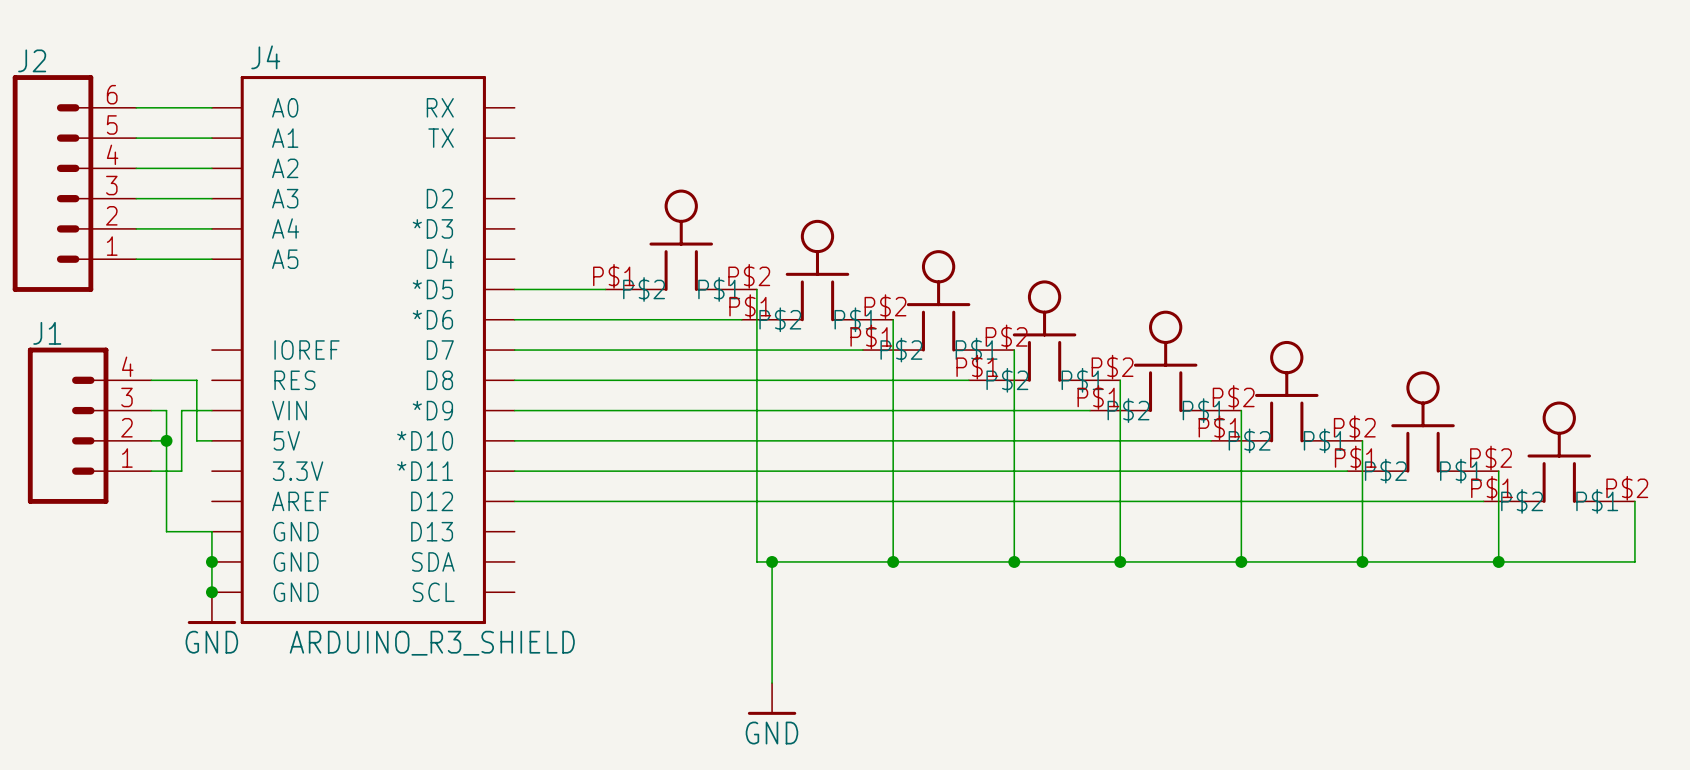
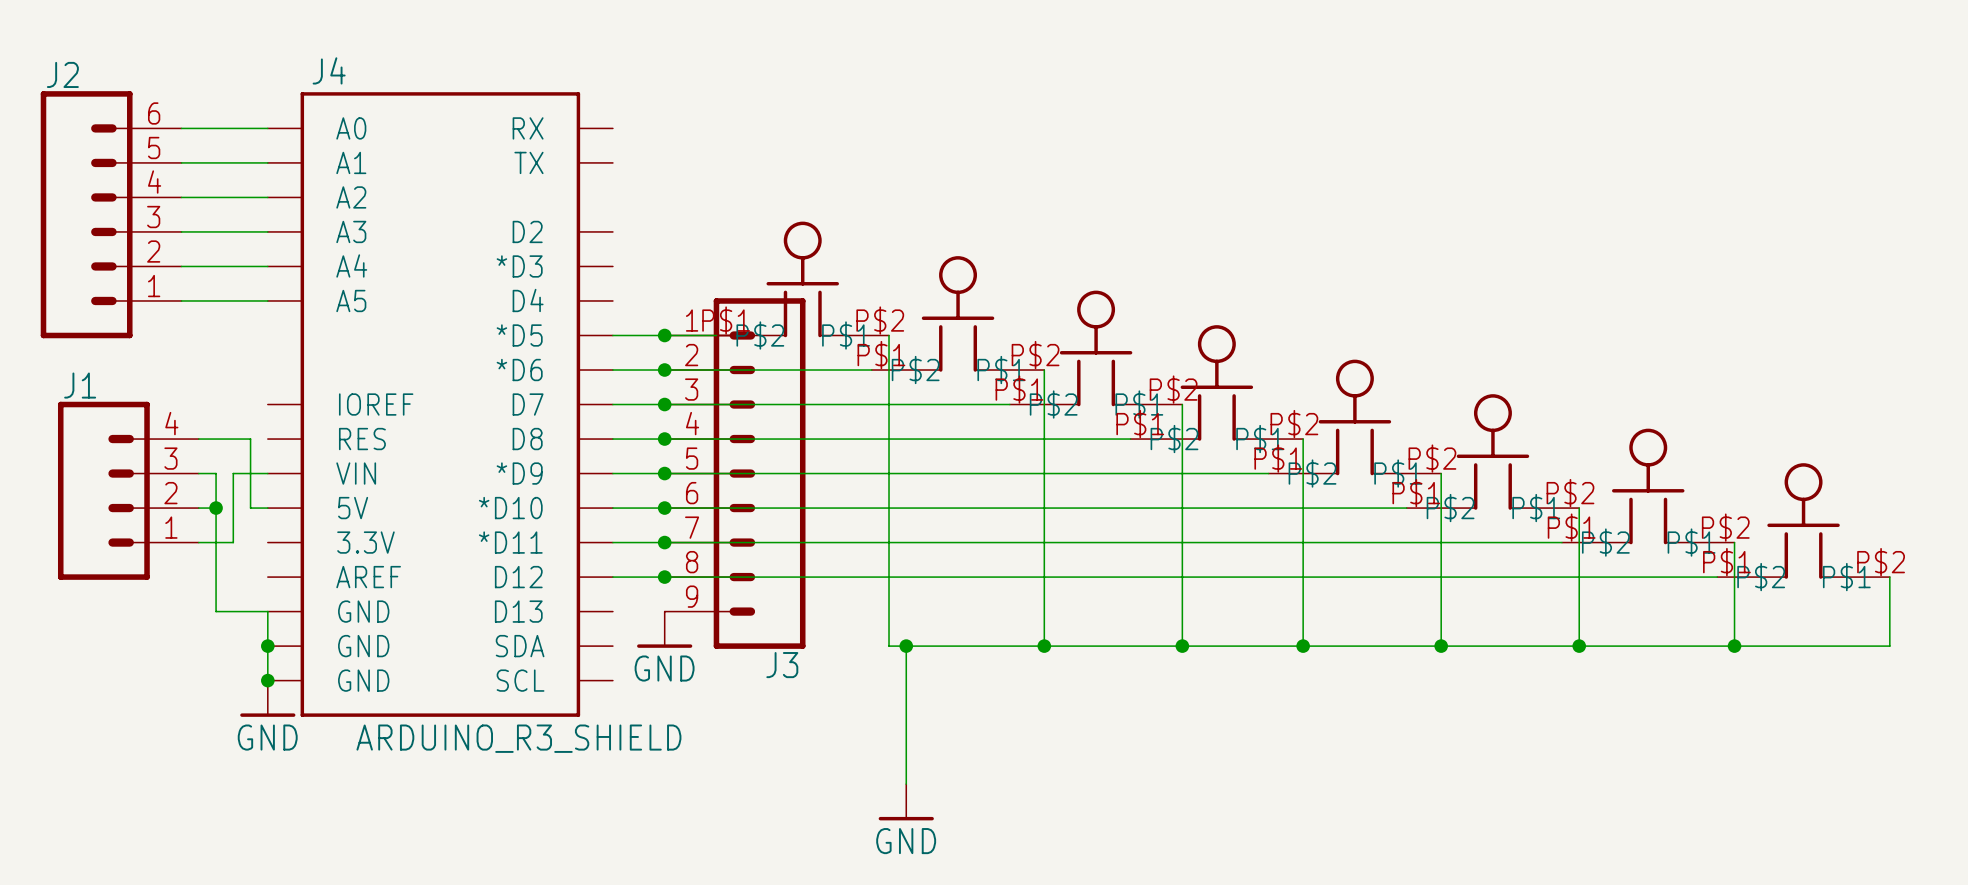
junction: none -> (664, 335)
junction: none -> (664, 370)
junction: none -> (664, 404)
junction: none -> (664, 439)
junction: none -> (664, 473)
J3: none -> (735, 473)
junction: none -> (664, 508)
junction: none -> (664, 542)
junction: none -> (664, 577)
power symbol: none -> GND (664, 629)

